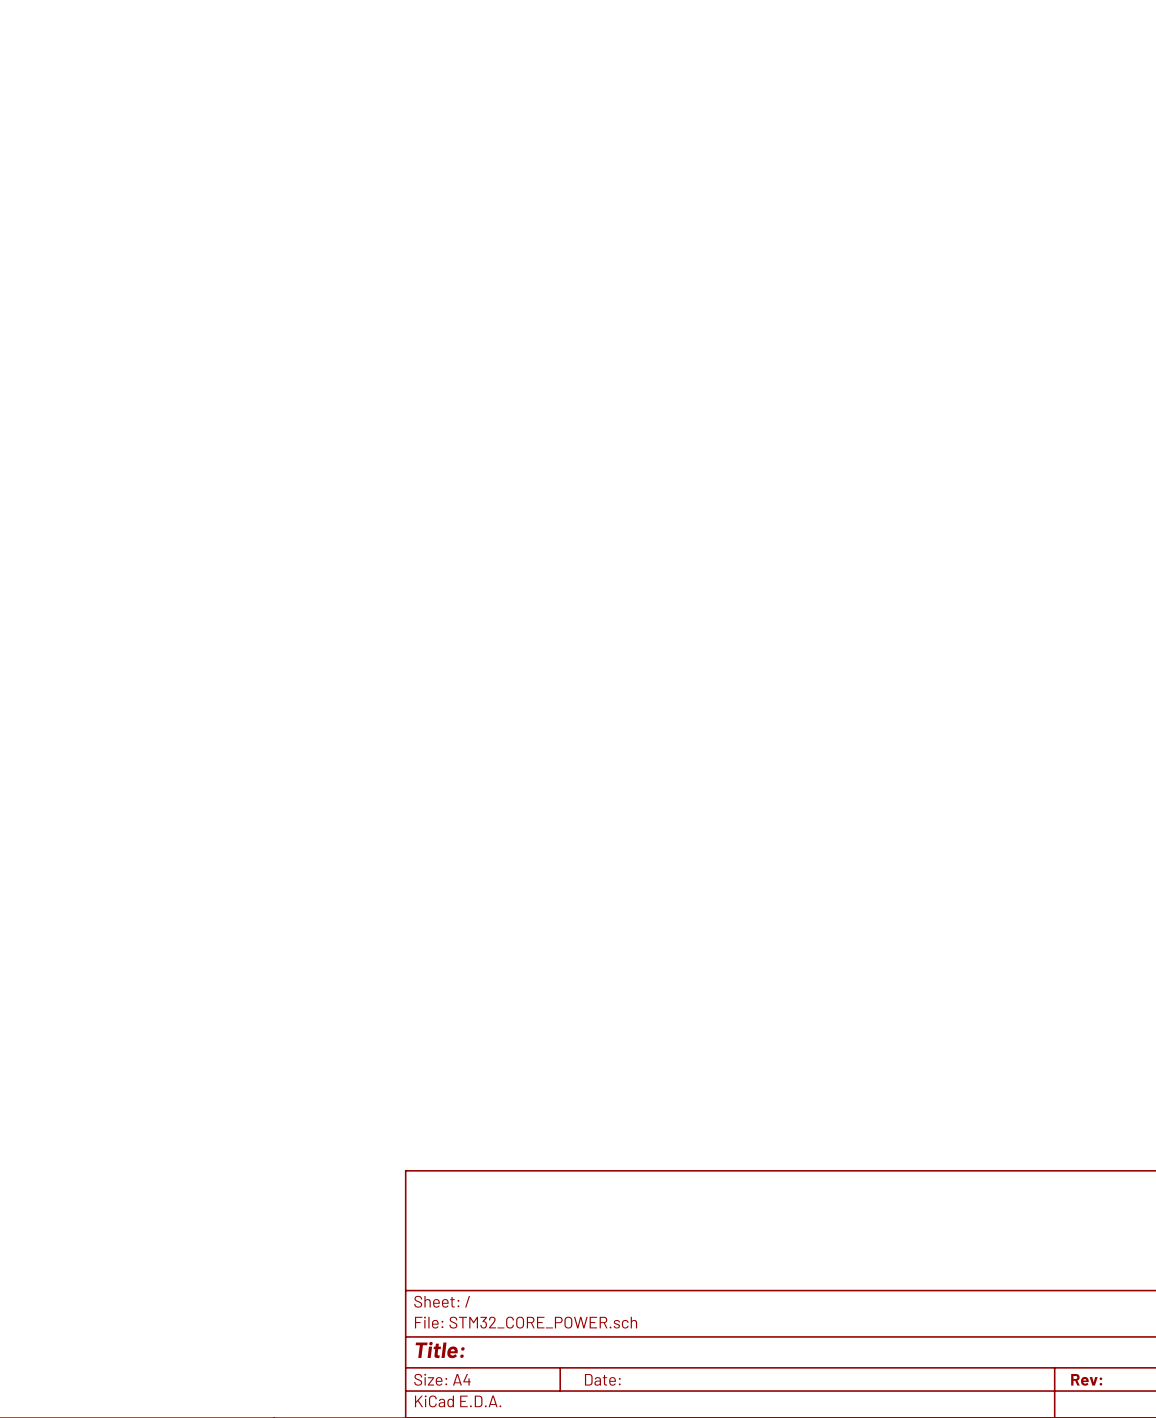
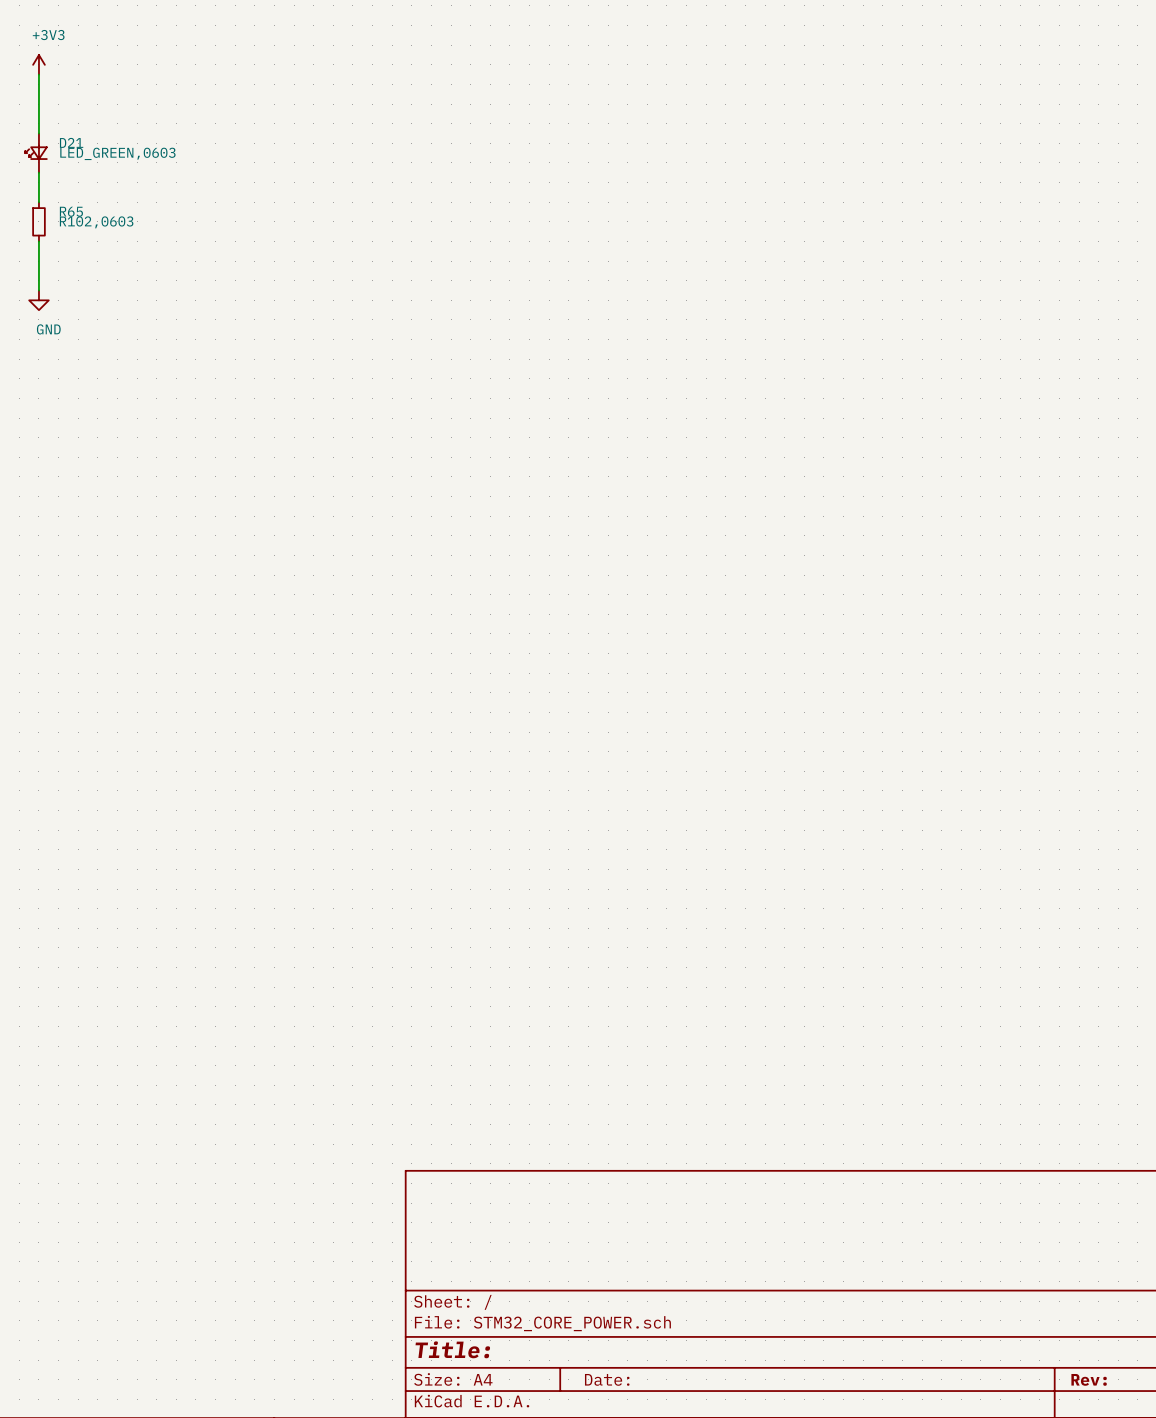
power symbol: none -> +3V3 (38, 64)
wire: none -> (38, 74) (38, 133)
D21: none -> LED_GREEN,0603 (36, 153)
wire: none -> (38, 172) (38, 202)
R65: none -> R102,0603 (38, 221)
wire: none -> (38, 241) (38, 290)
power symbol: none -> GND (38, 300)

